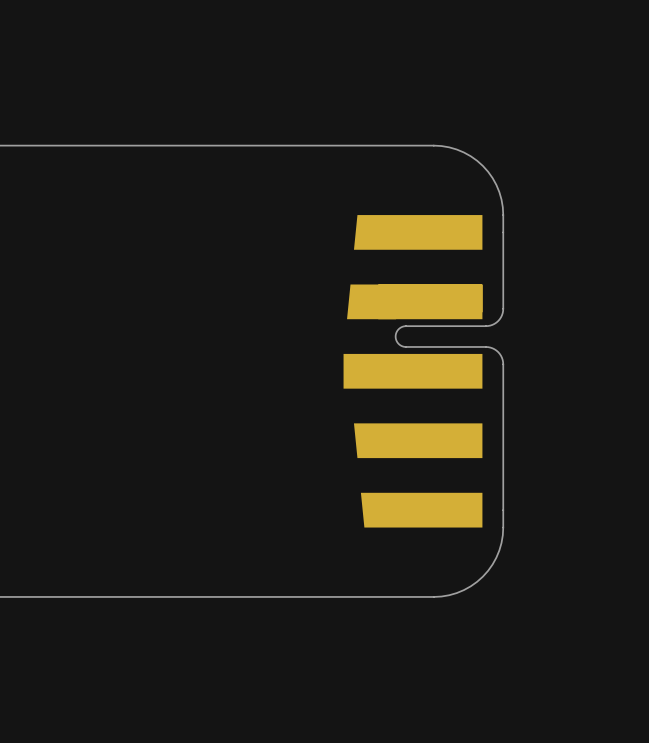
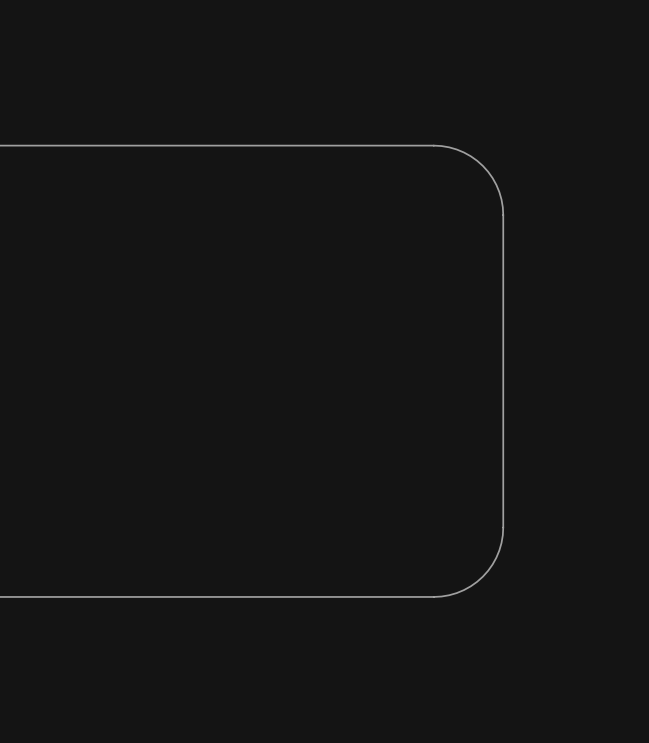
board edge: none -> (503, 232) (503, 510)
part: (423, 371) -> none

